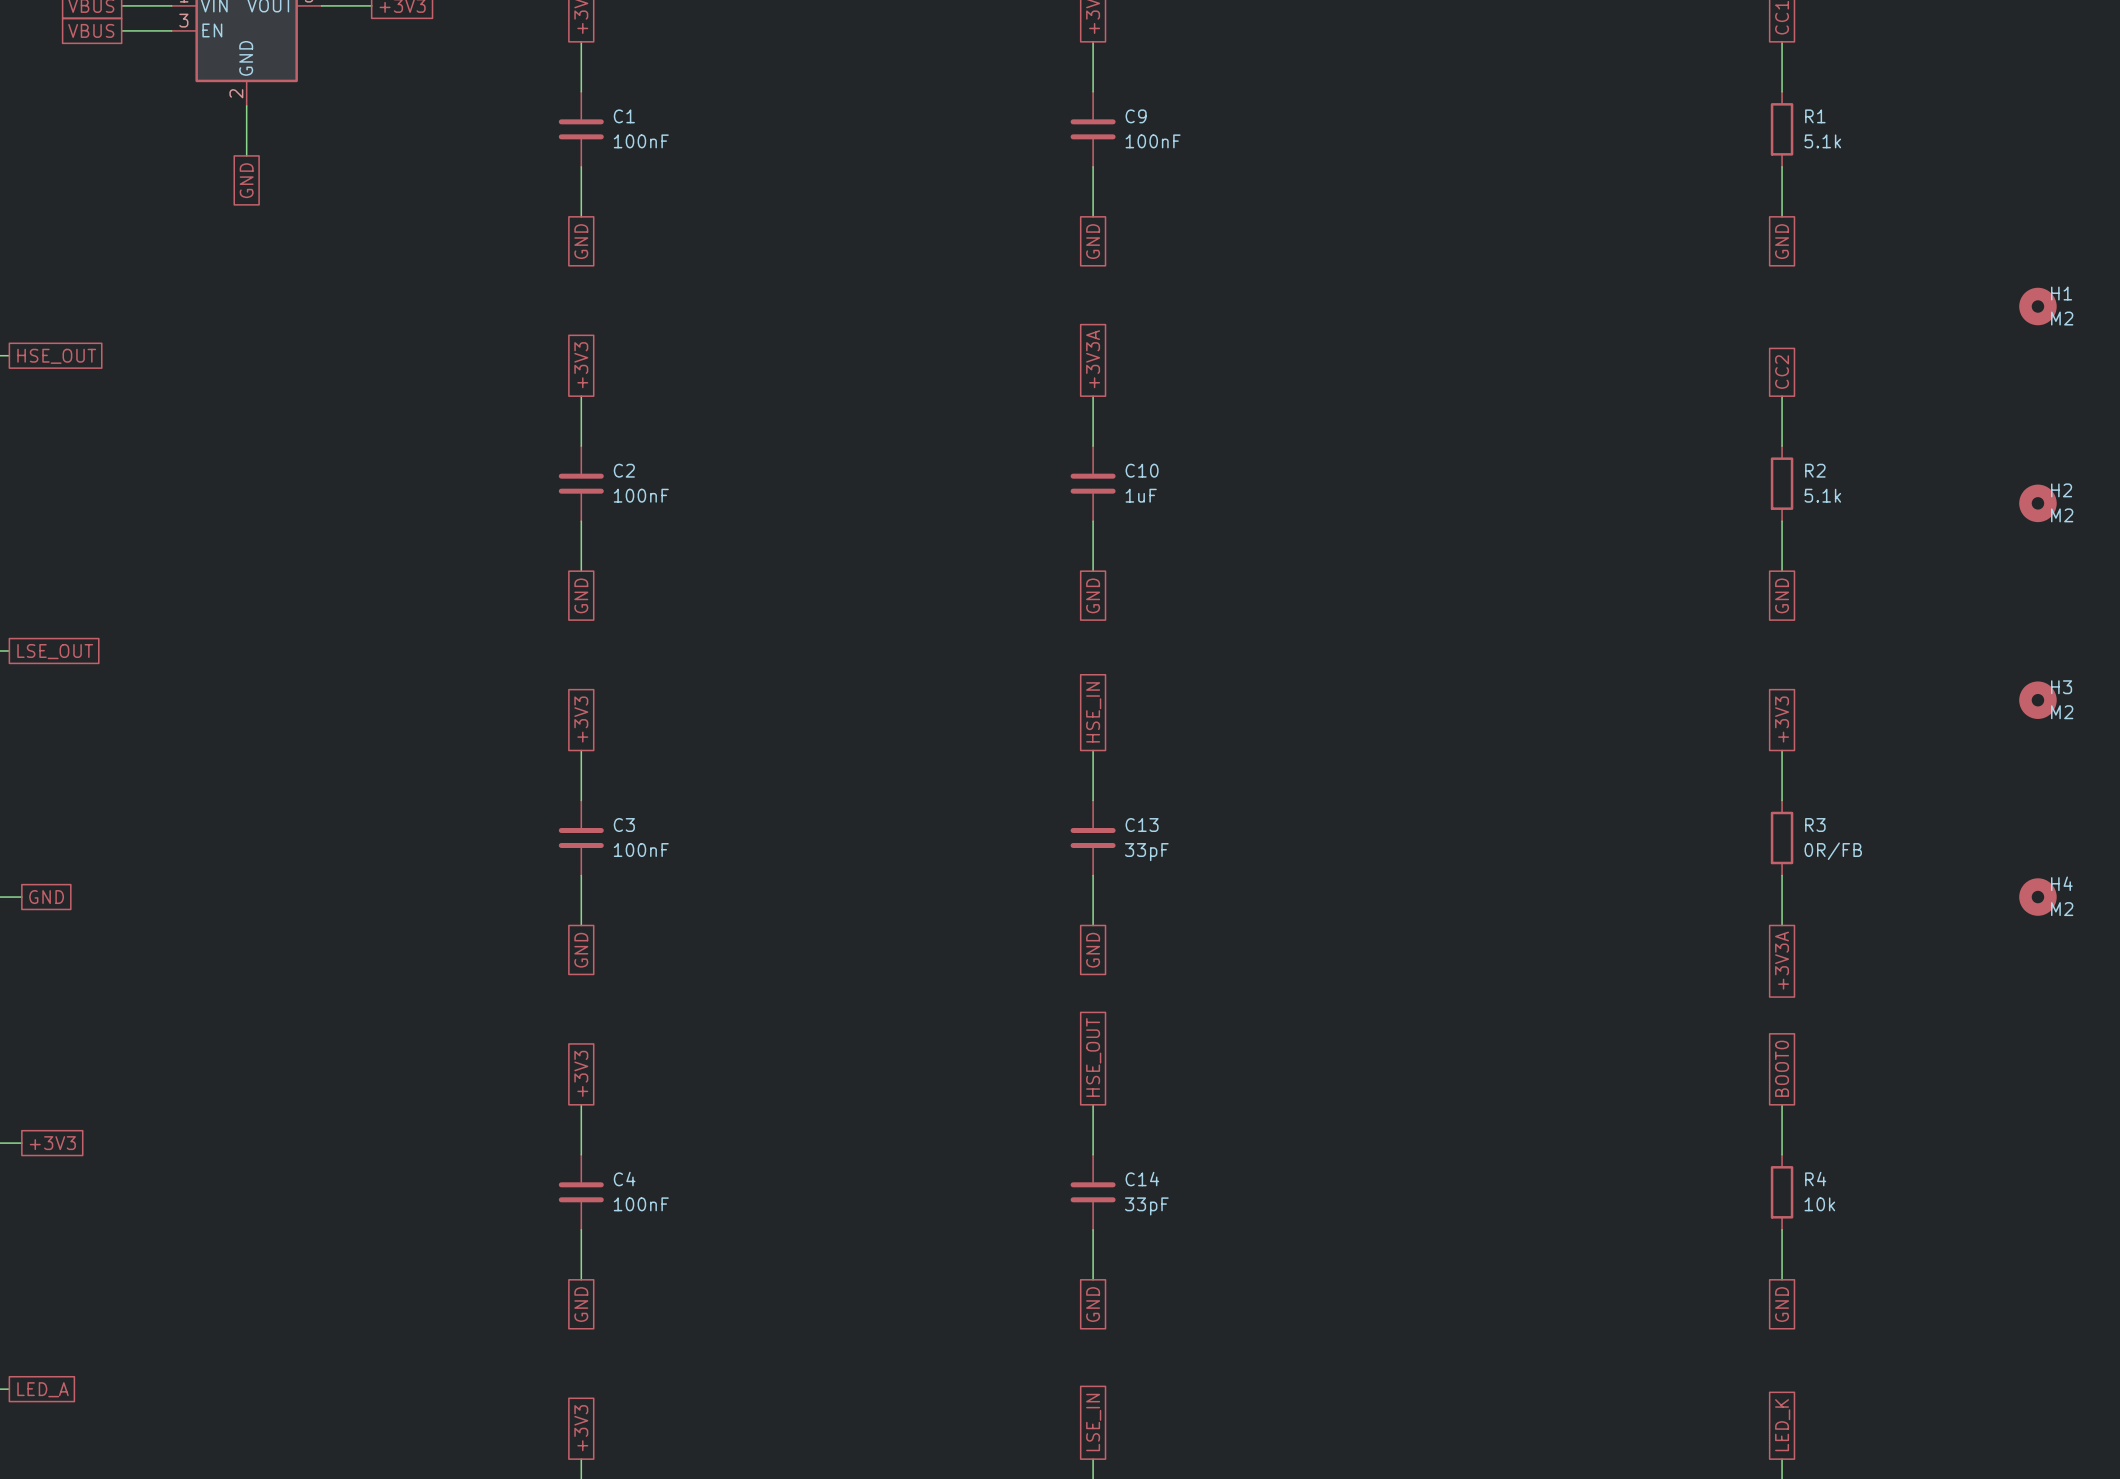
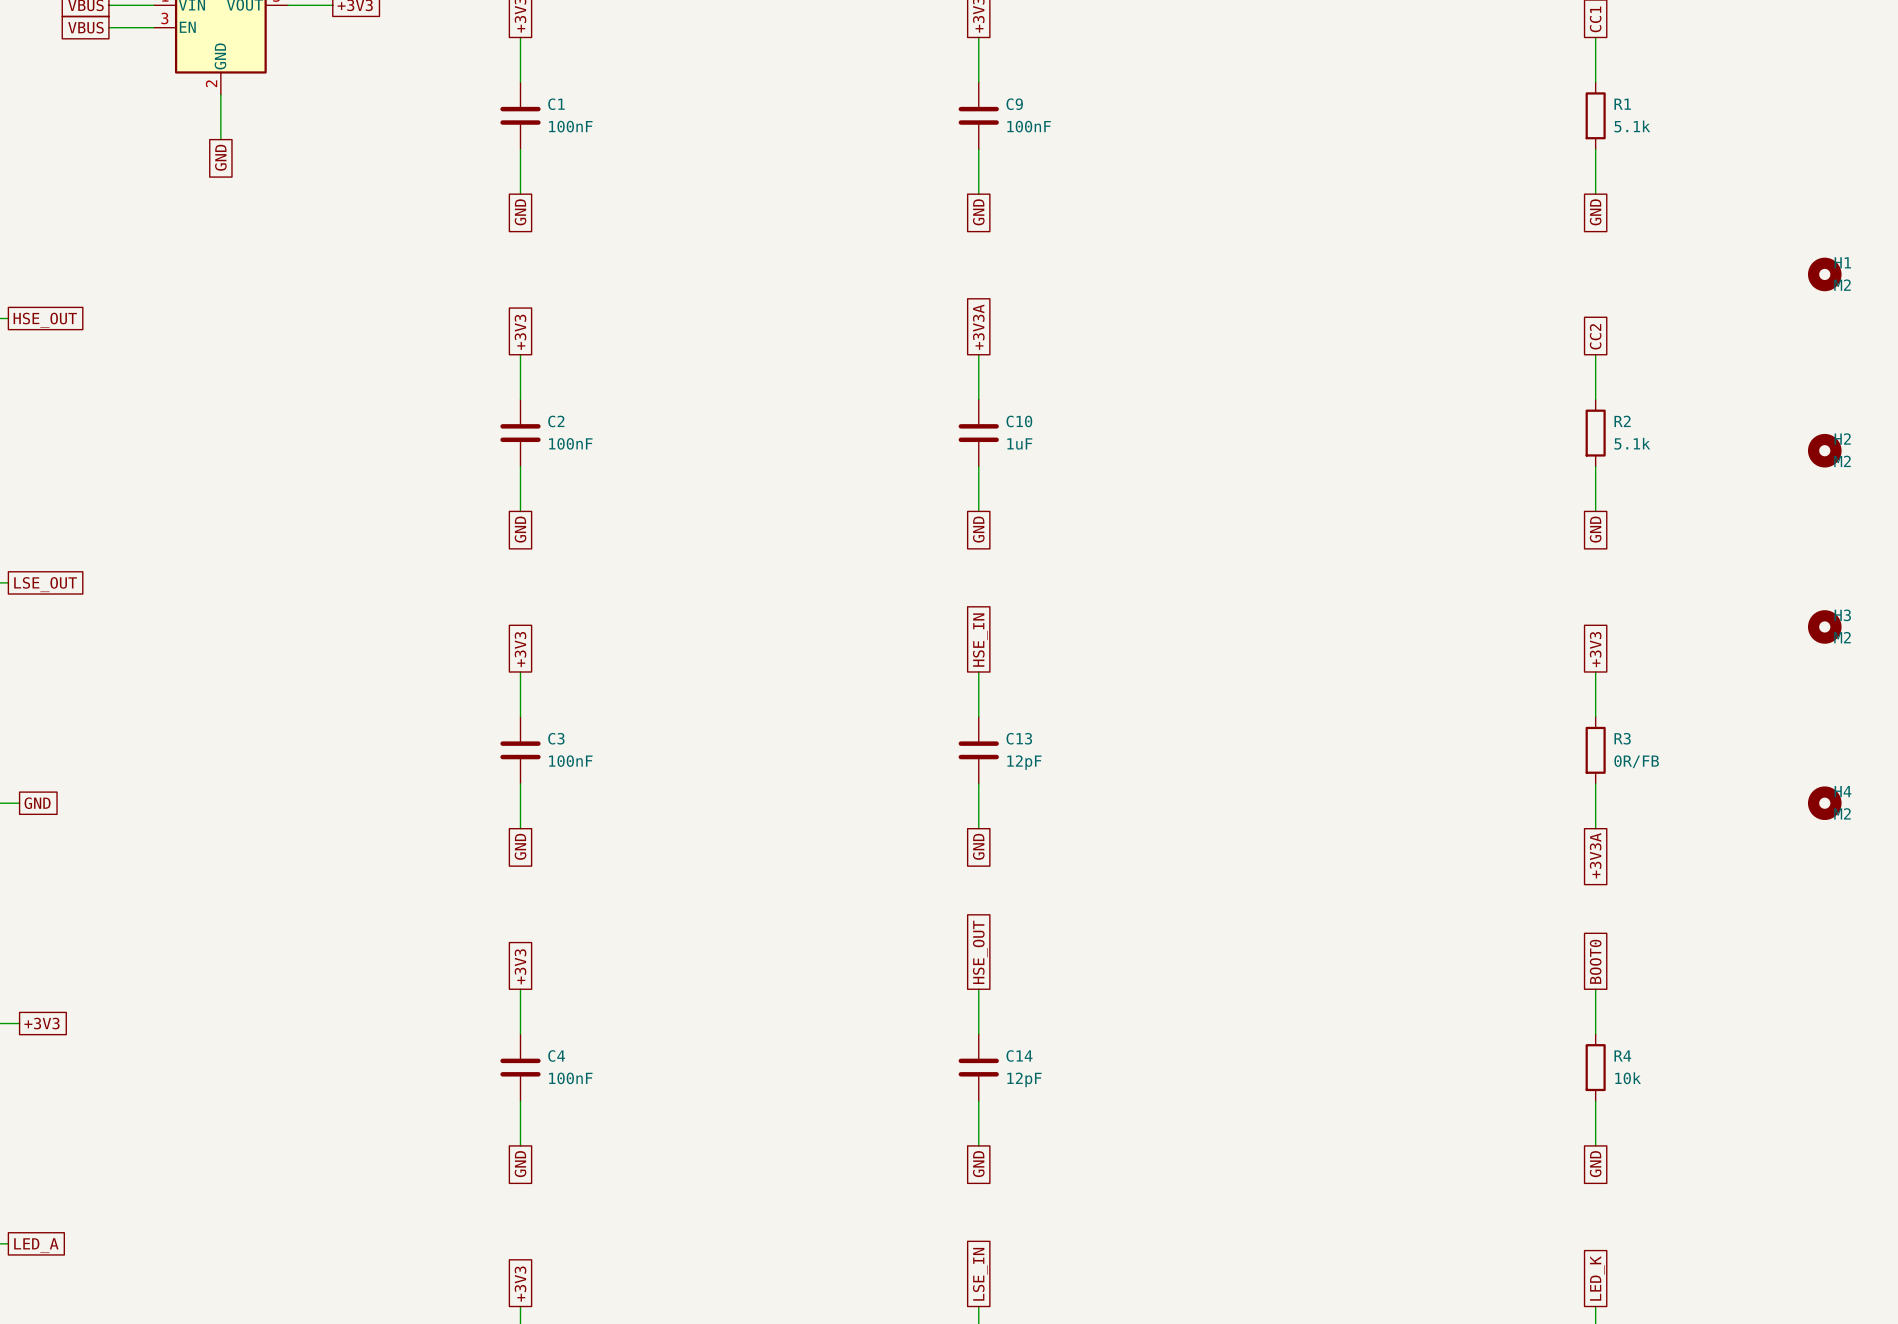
C13 value: 33pF (1146, 852) -> 12pF (1024, 762)
C14 value: 33pF (1146, 1206) -> 12pF (1024, 1079)

